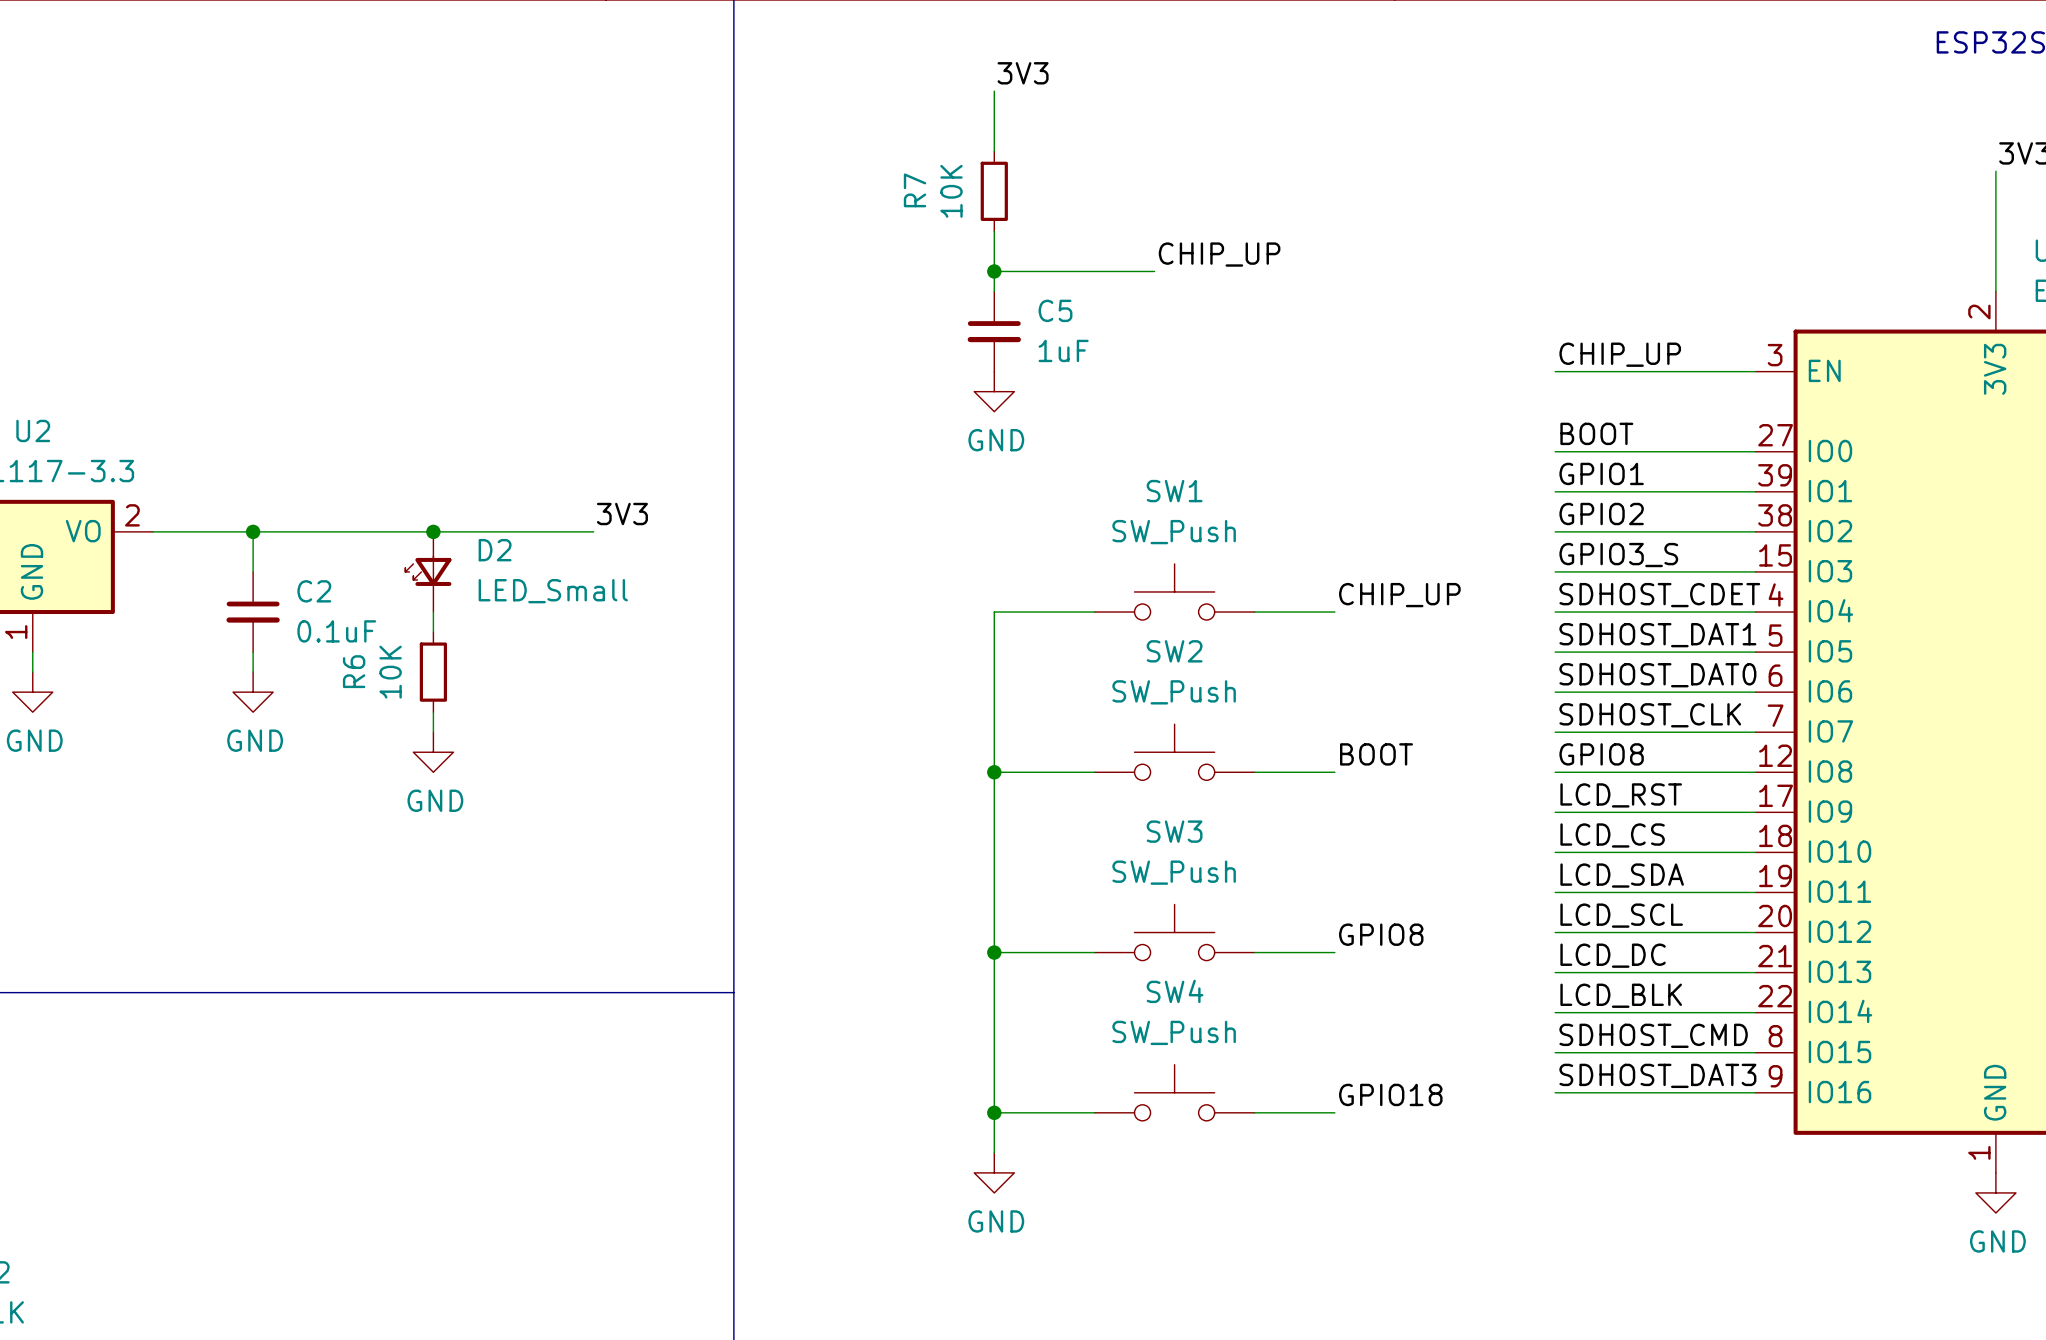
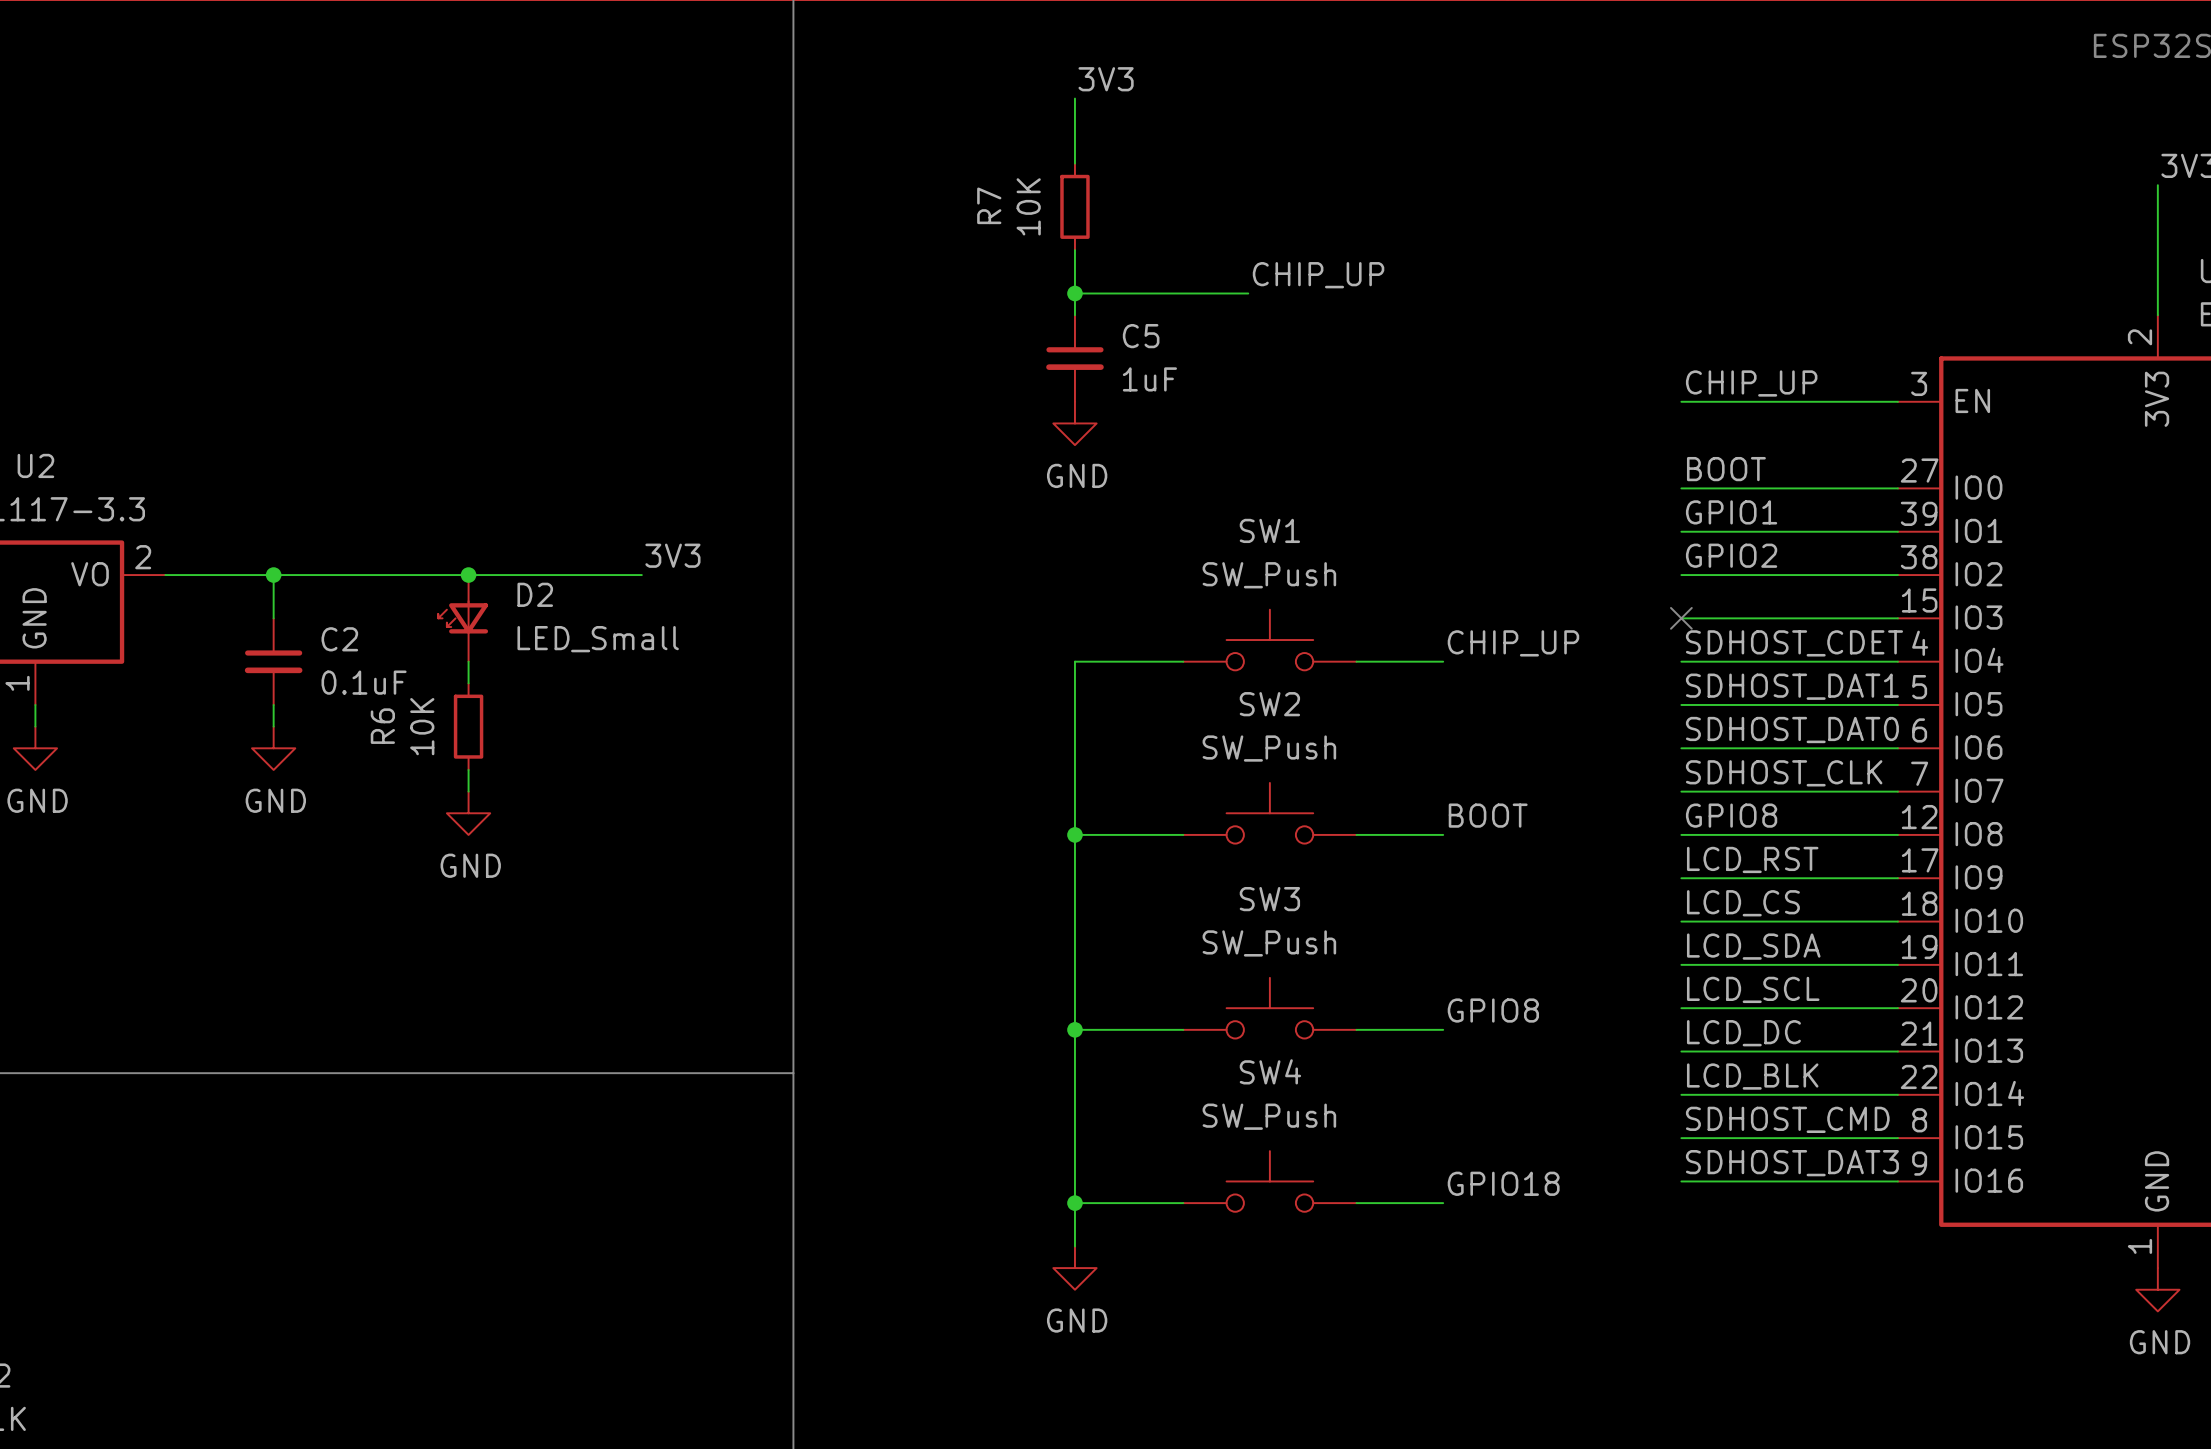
label: GPIO3_S (1618, 555) -> none
no-connect mark: none -> (1681, 618)

